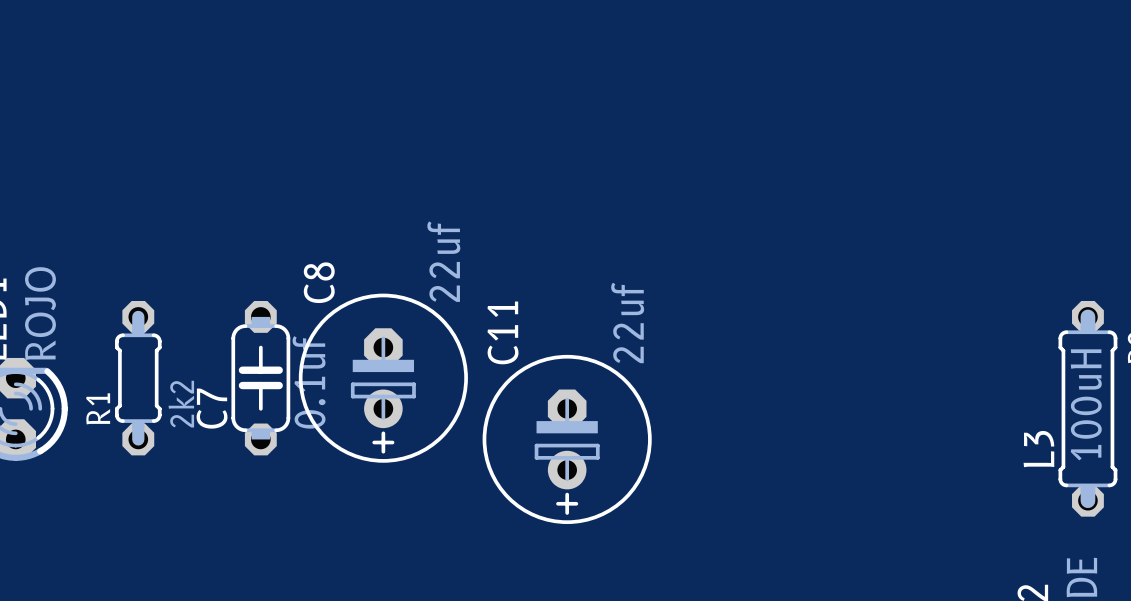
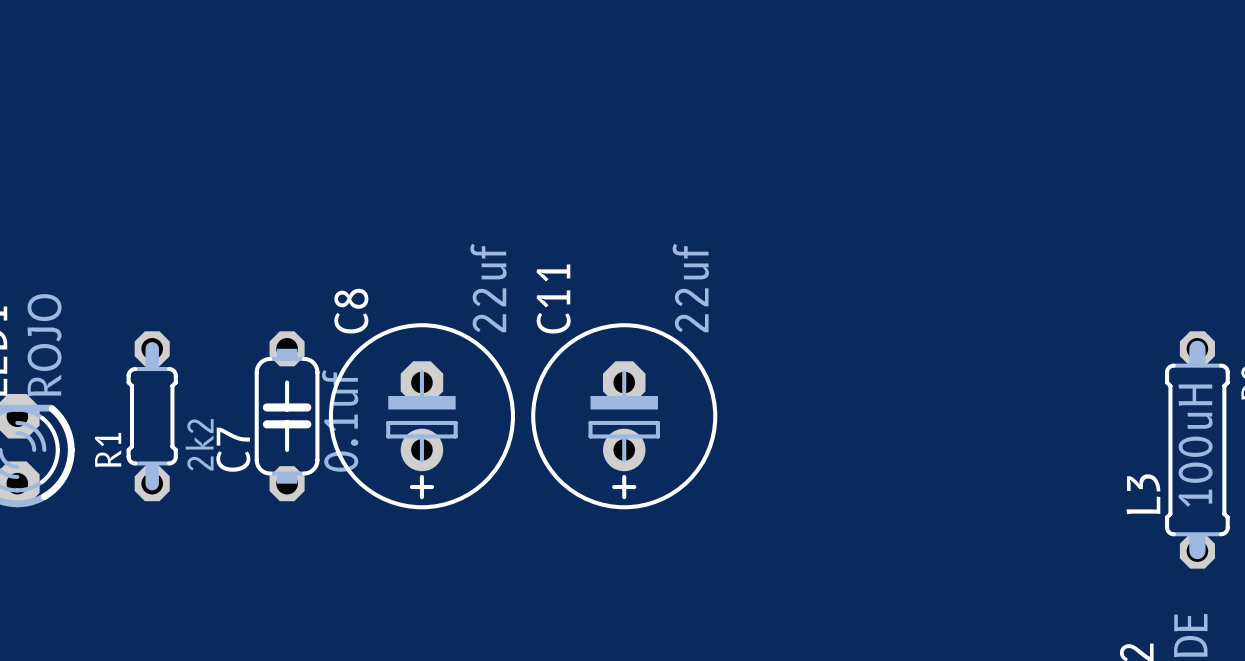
C11 position: (567, 439) -> (624, 416)

